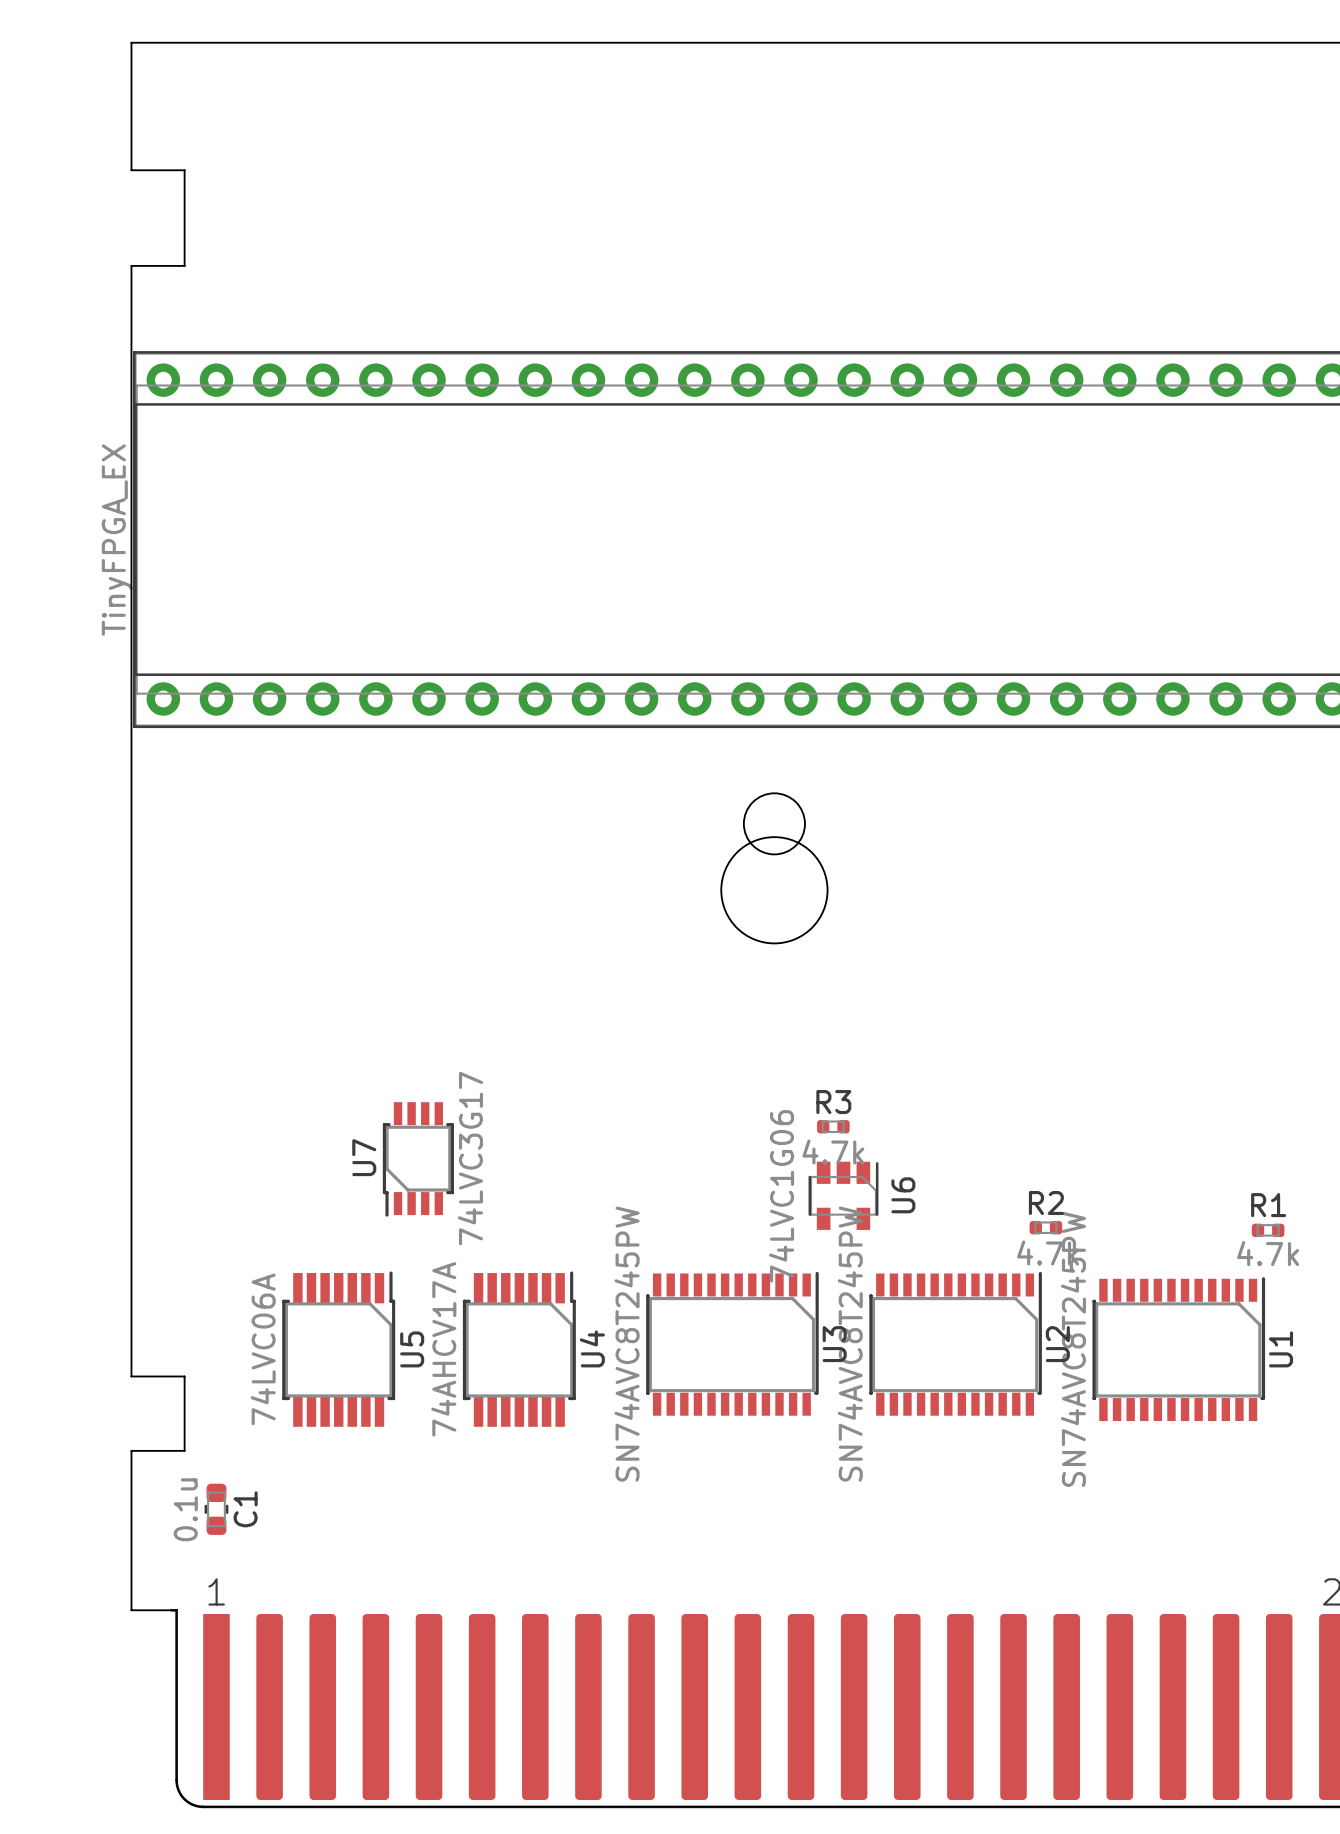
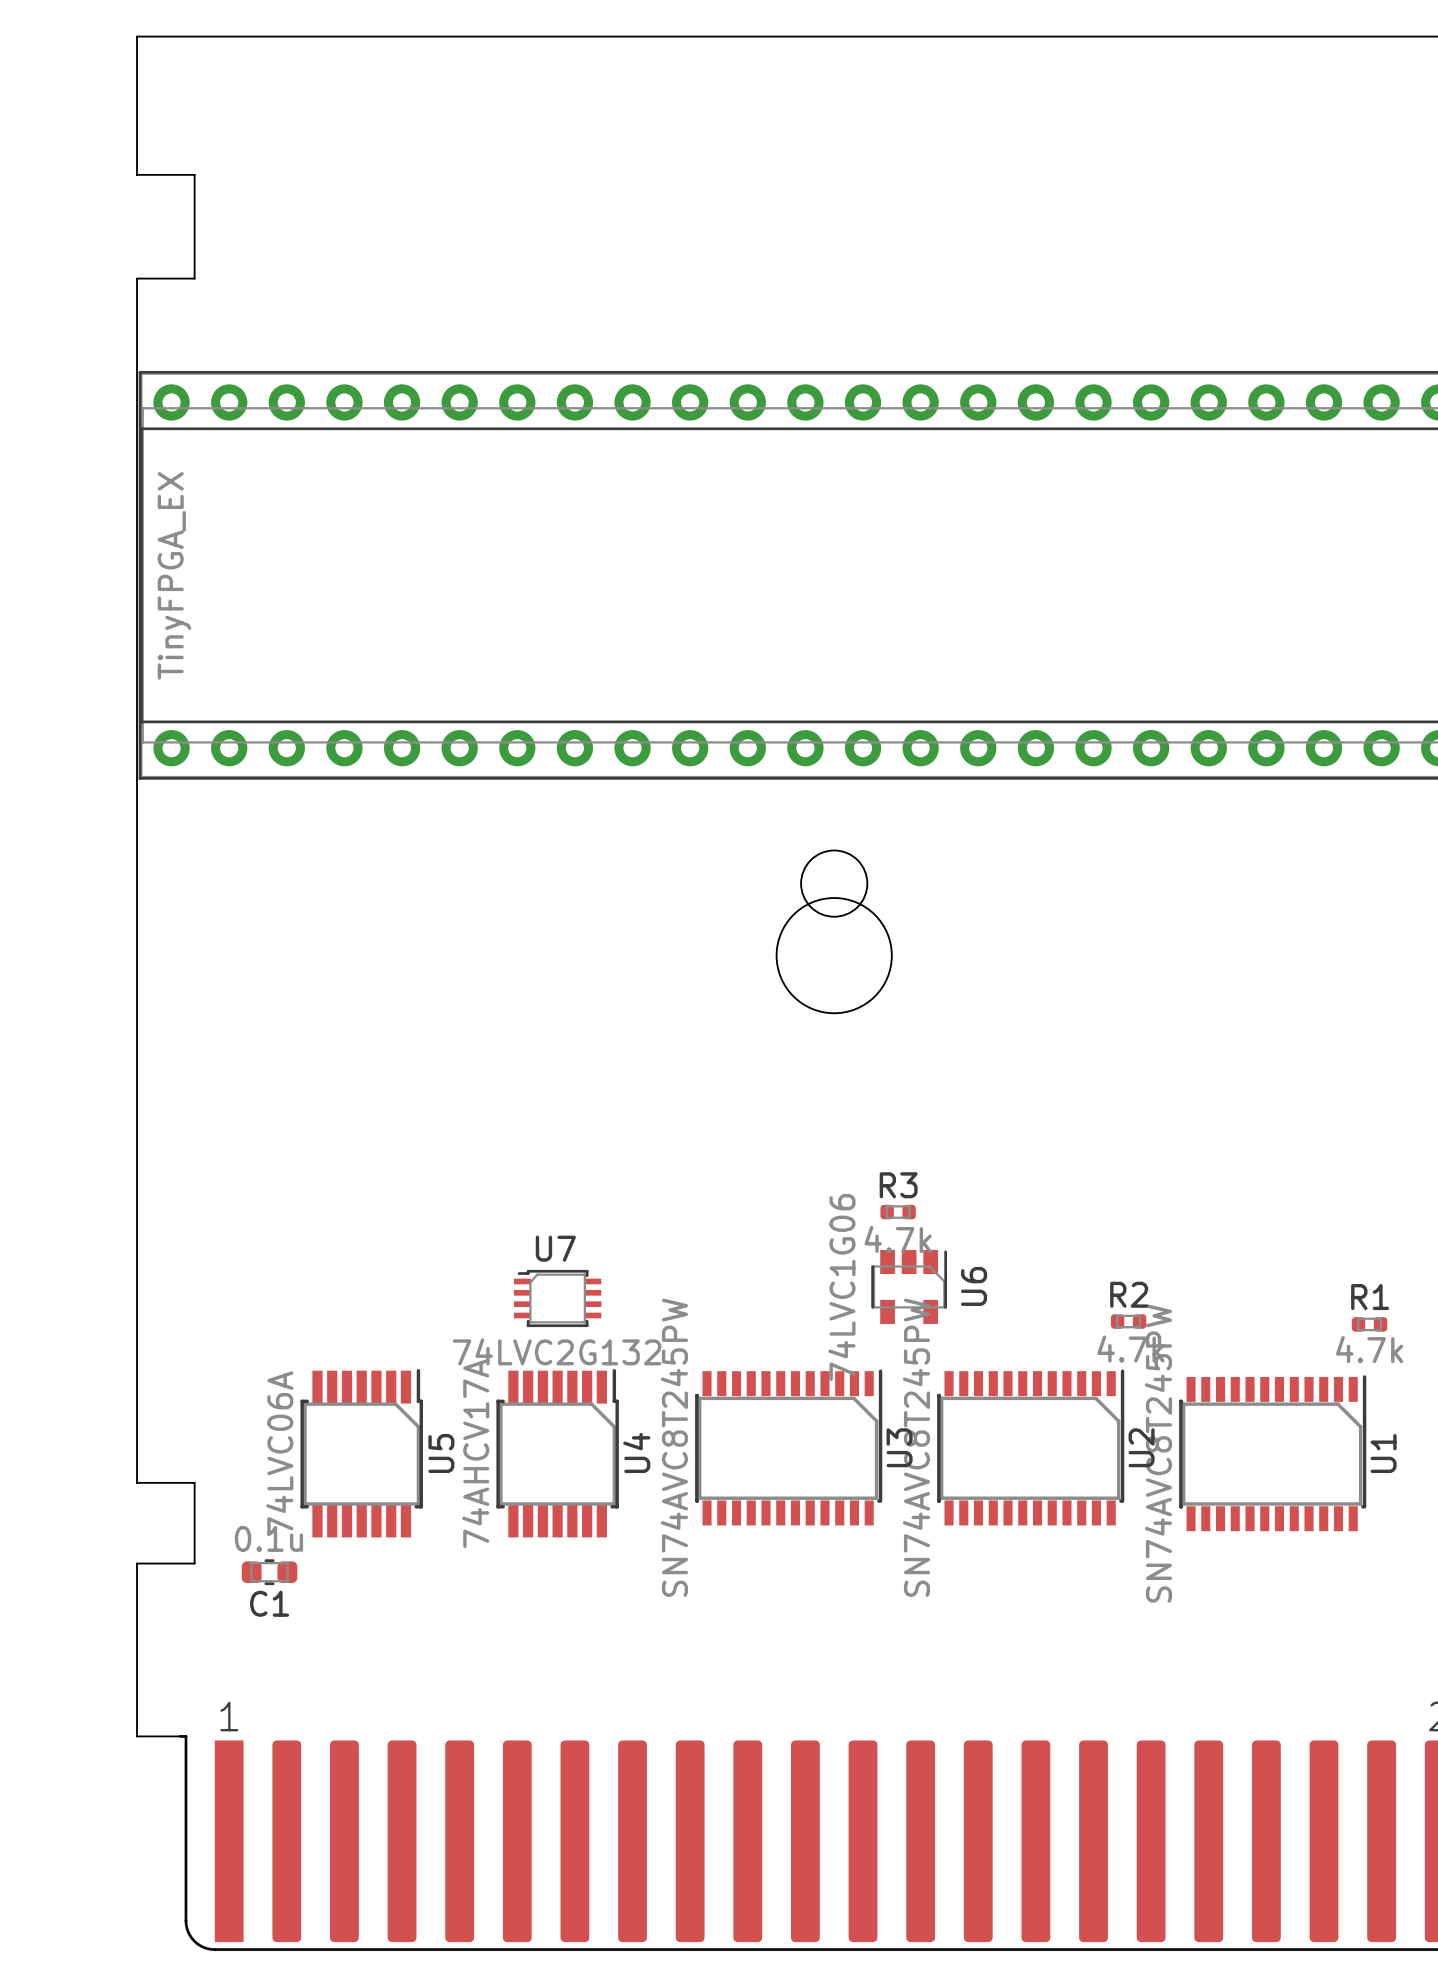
part value position: TinyFPGA_EX (117, 540) -> TinyFPGA_EX (174, 575)
U7 footprint: [382, 1102, 454, 1217] -> [513, 1269, 602, 1328]
U7 name position: U7 (364, 1157) -> U7 (555, 1248)
U7 value: 74LVC3G17 (470, 1158) -> 74LVC2G132 (557, 1351)
C1 rotation: 0° (216, 1509) -> 90° clockwise (269, 1572)
C1 position: (216, 1509) -> (269, 1572)

